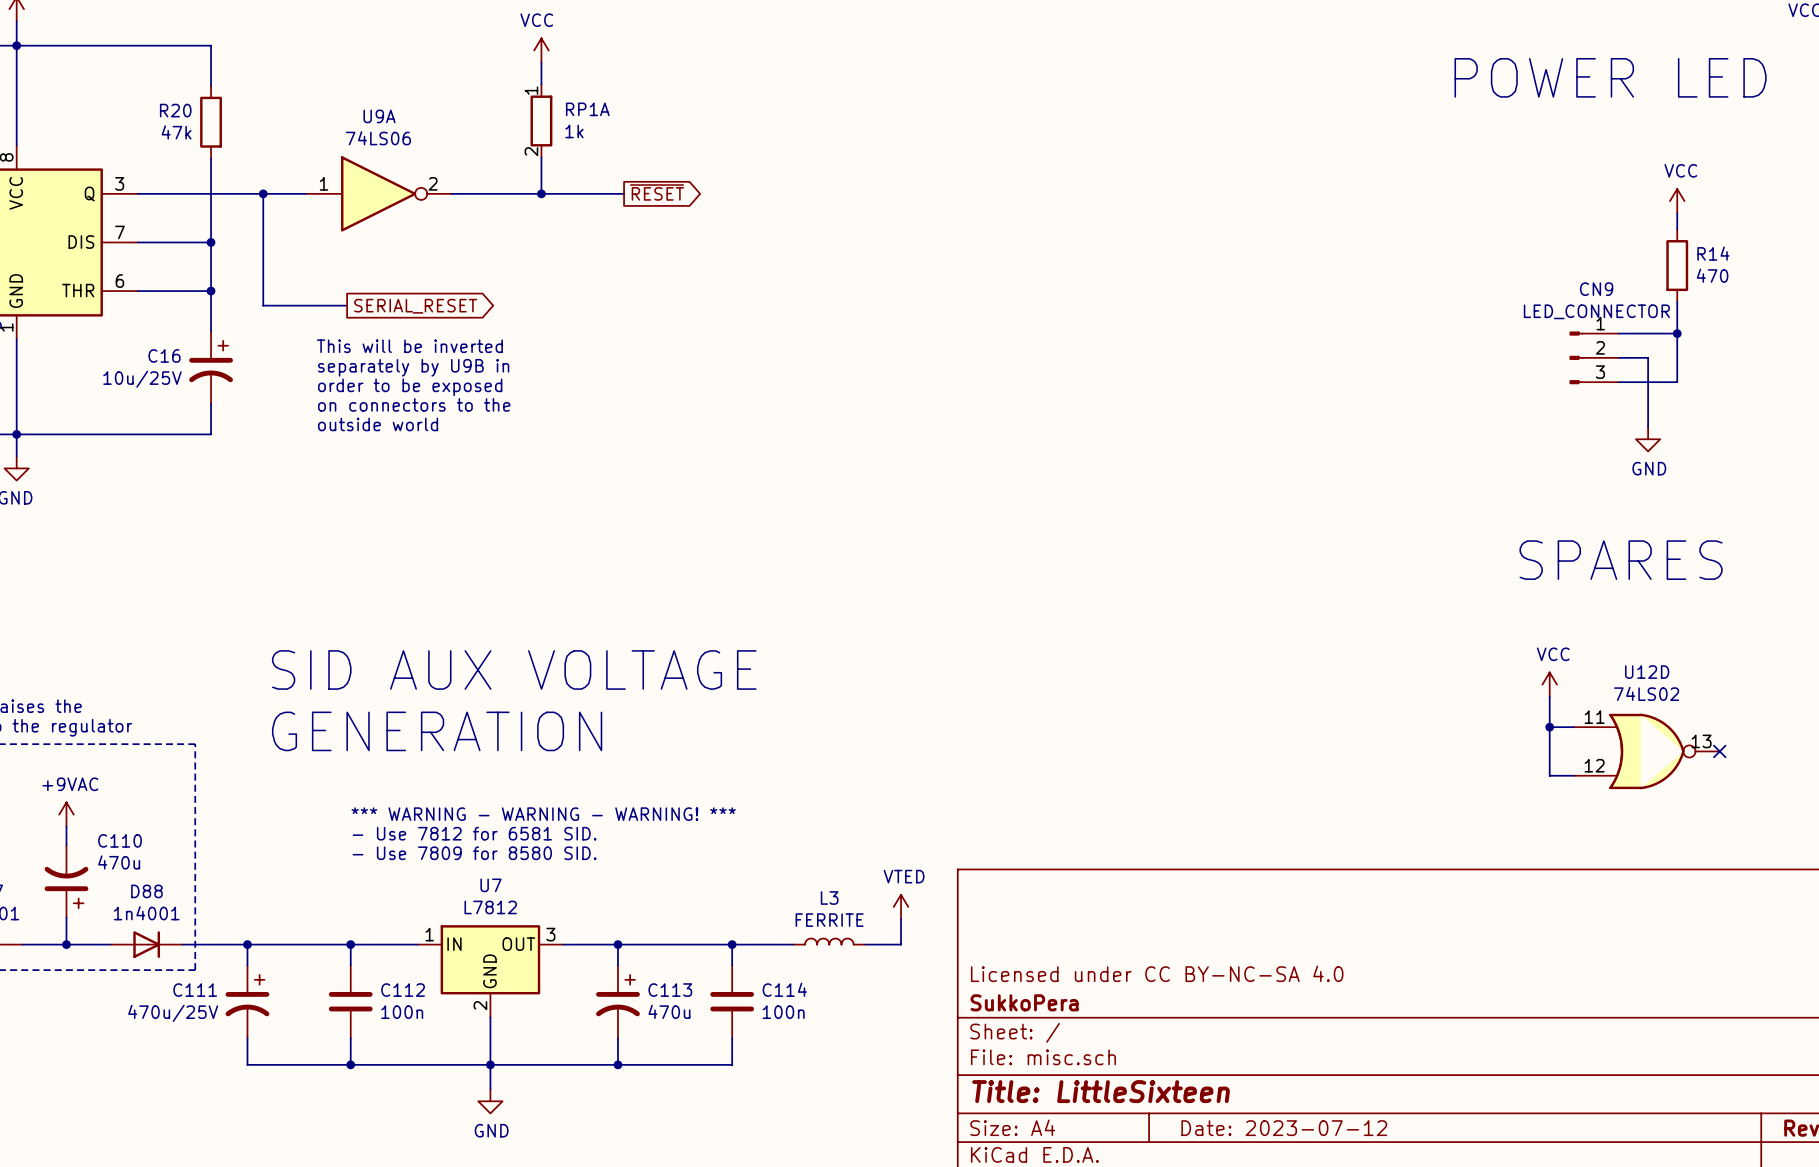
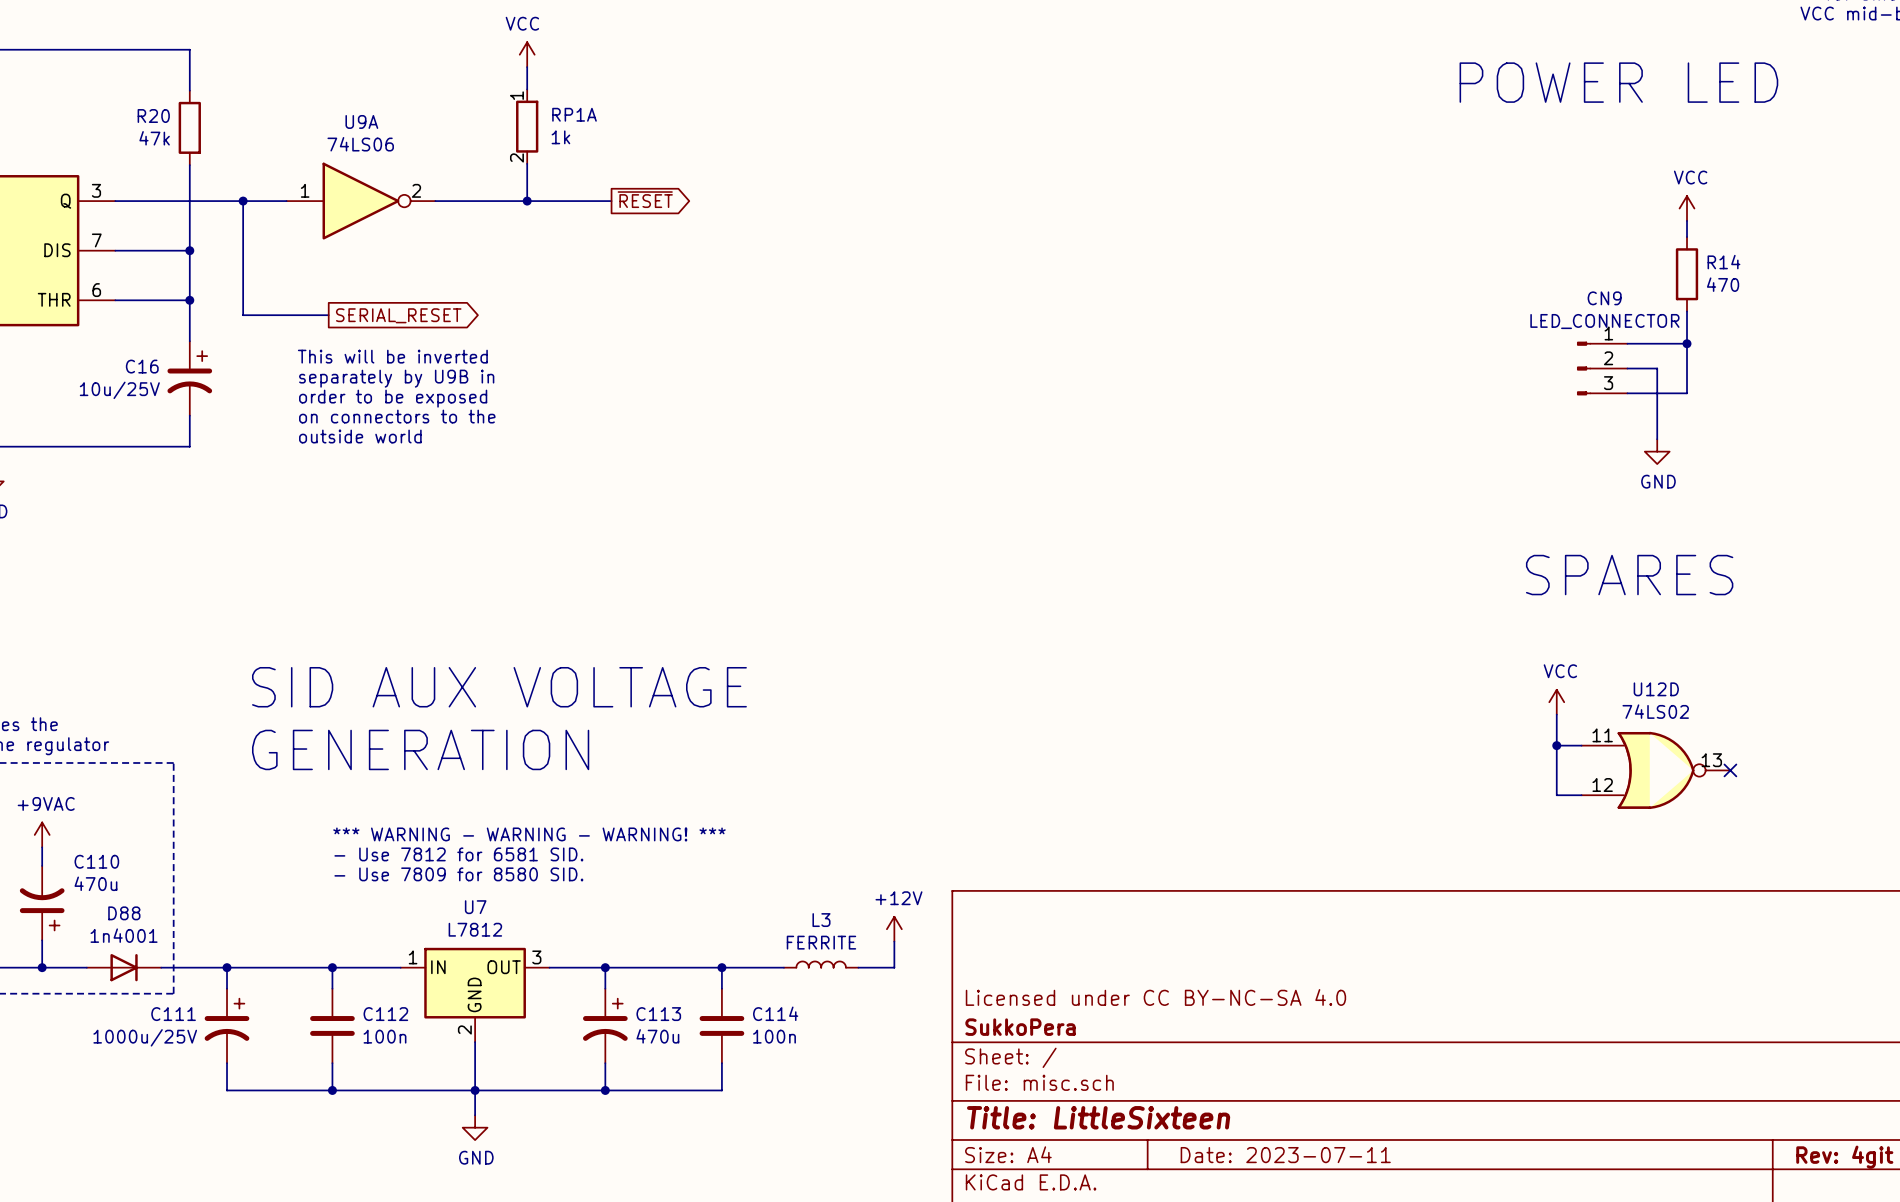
power symbol: VTED (901, 906) -> +12V (894, 929)
C111 value: 470u/25V (173, 1013) -> 1000u/25V (145, 1037)
title block: Date: 2023-07-12 (1284, 1128) -> Date: 2023-07-11 (1285, 1155)

